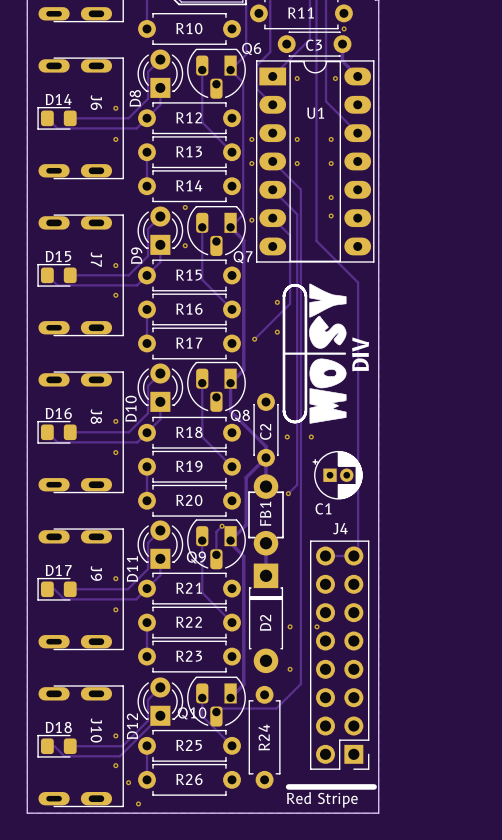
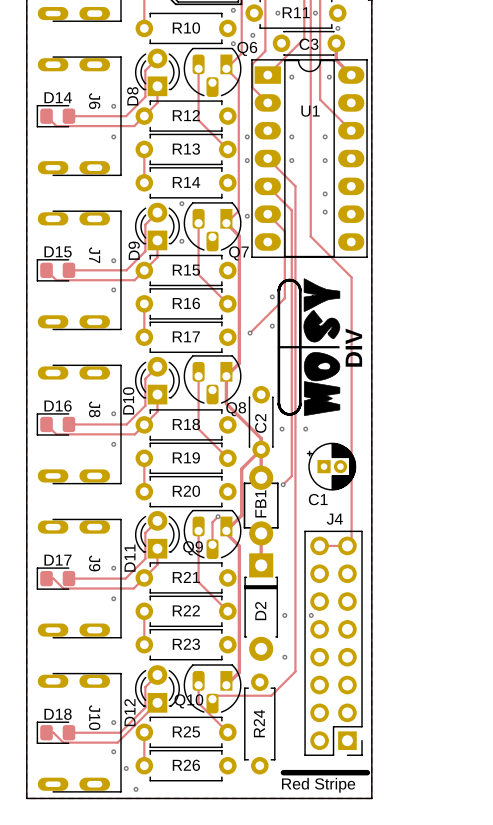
via: none -> (233, 10)
via: none -> (277, 13)
via: none -> (315, 13)
via: none -> (252, 35)
via: none -> (233, 43)

